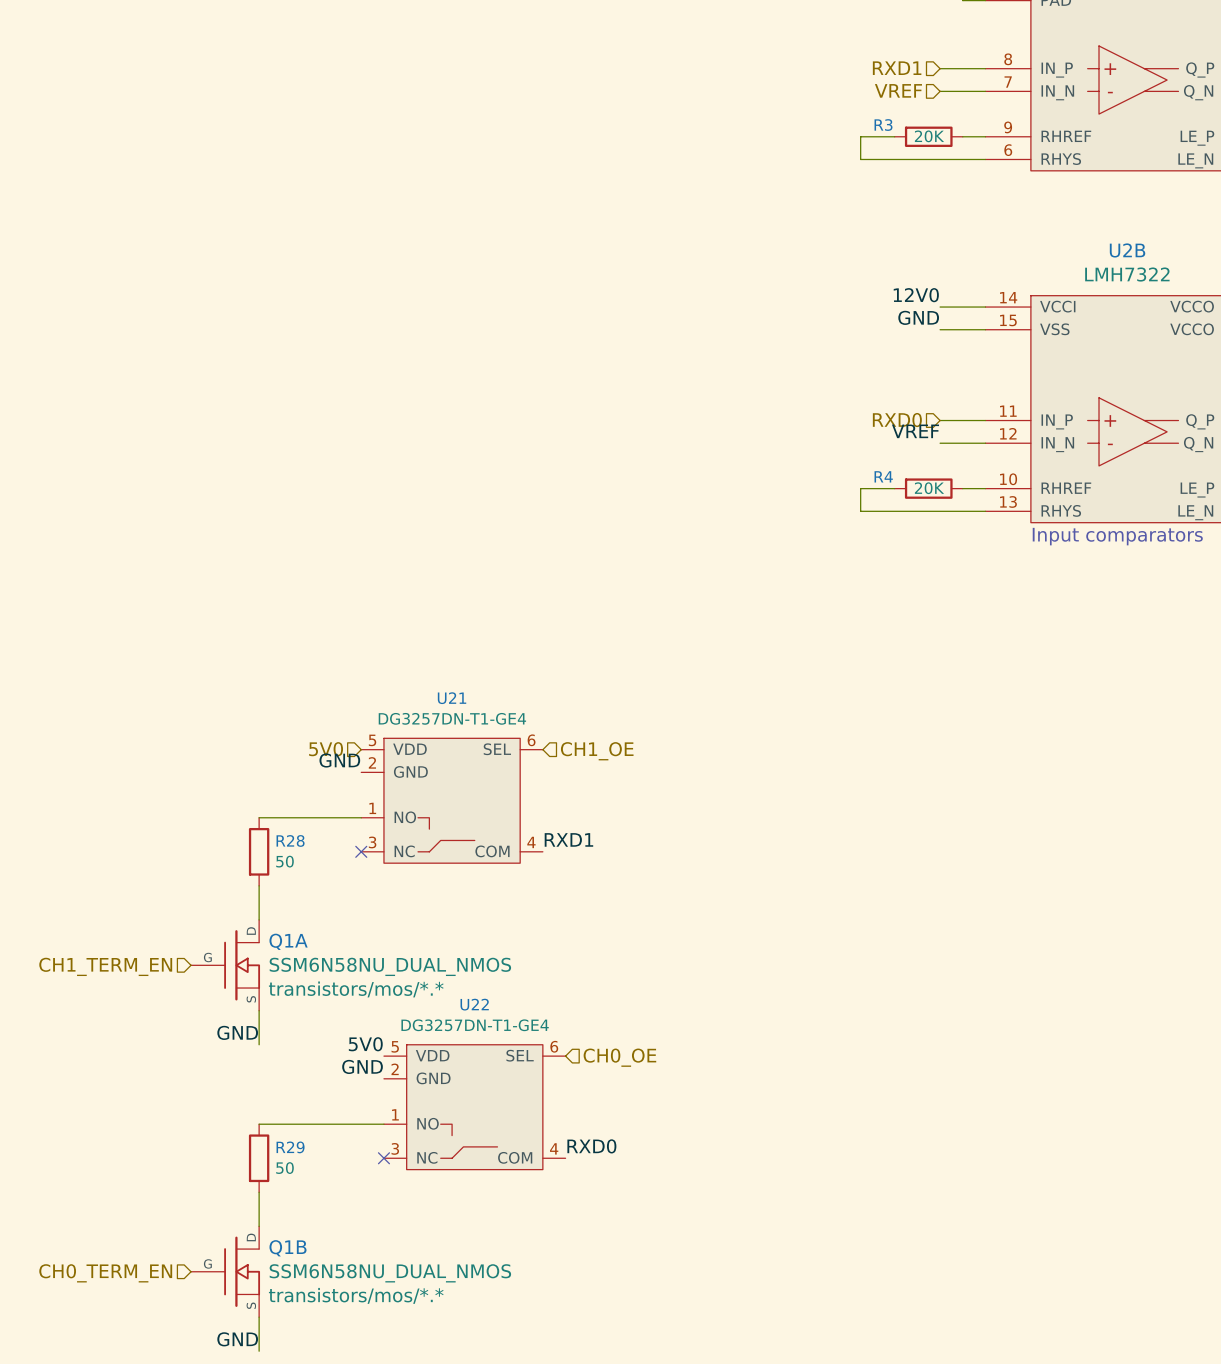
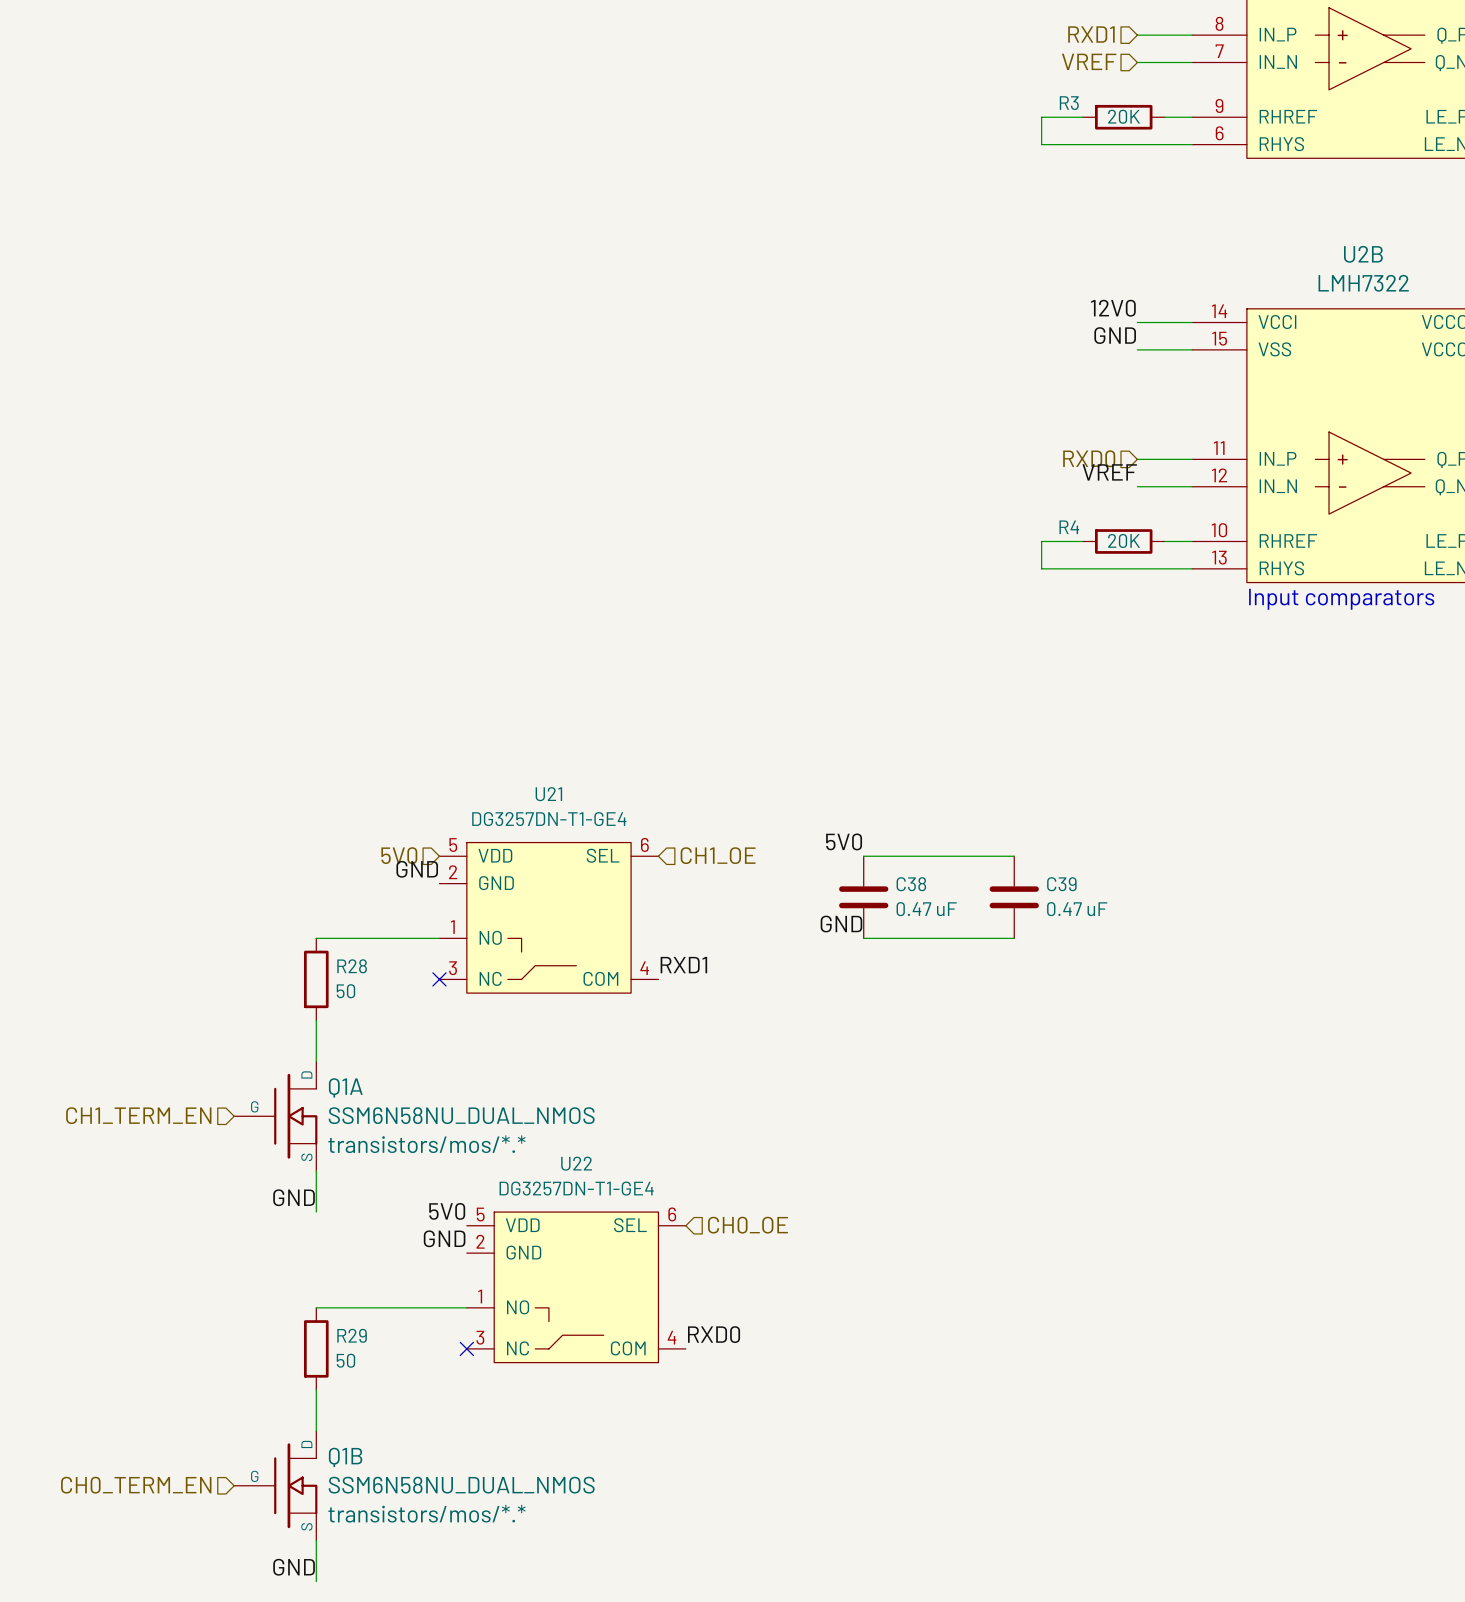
label: none -> 5V0 (844, 841)
wire: none -> (863, 856) (1014, 856)
C38: none -> 0.47 uF (863, 897)
C39: none -> 0.47 uF (1014, 897)
label: none -> GND (841, 924)
wire: none -> (863, 938) (1014, 938)

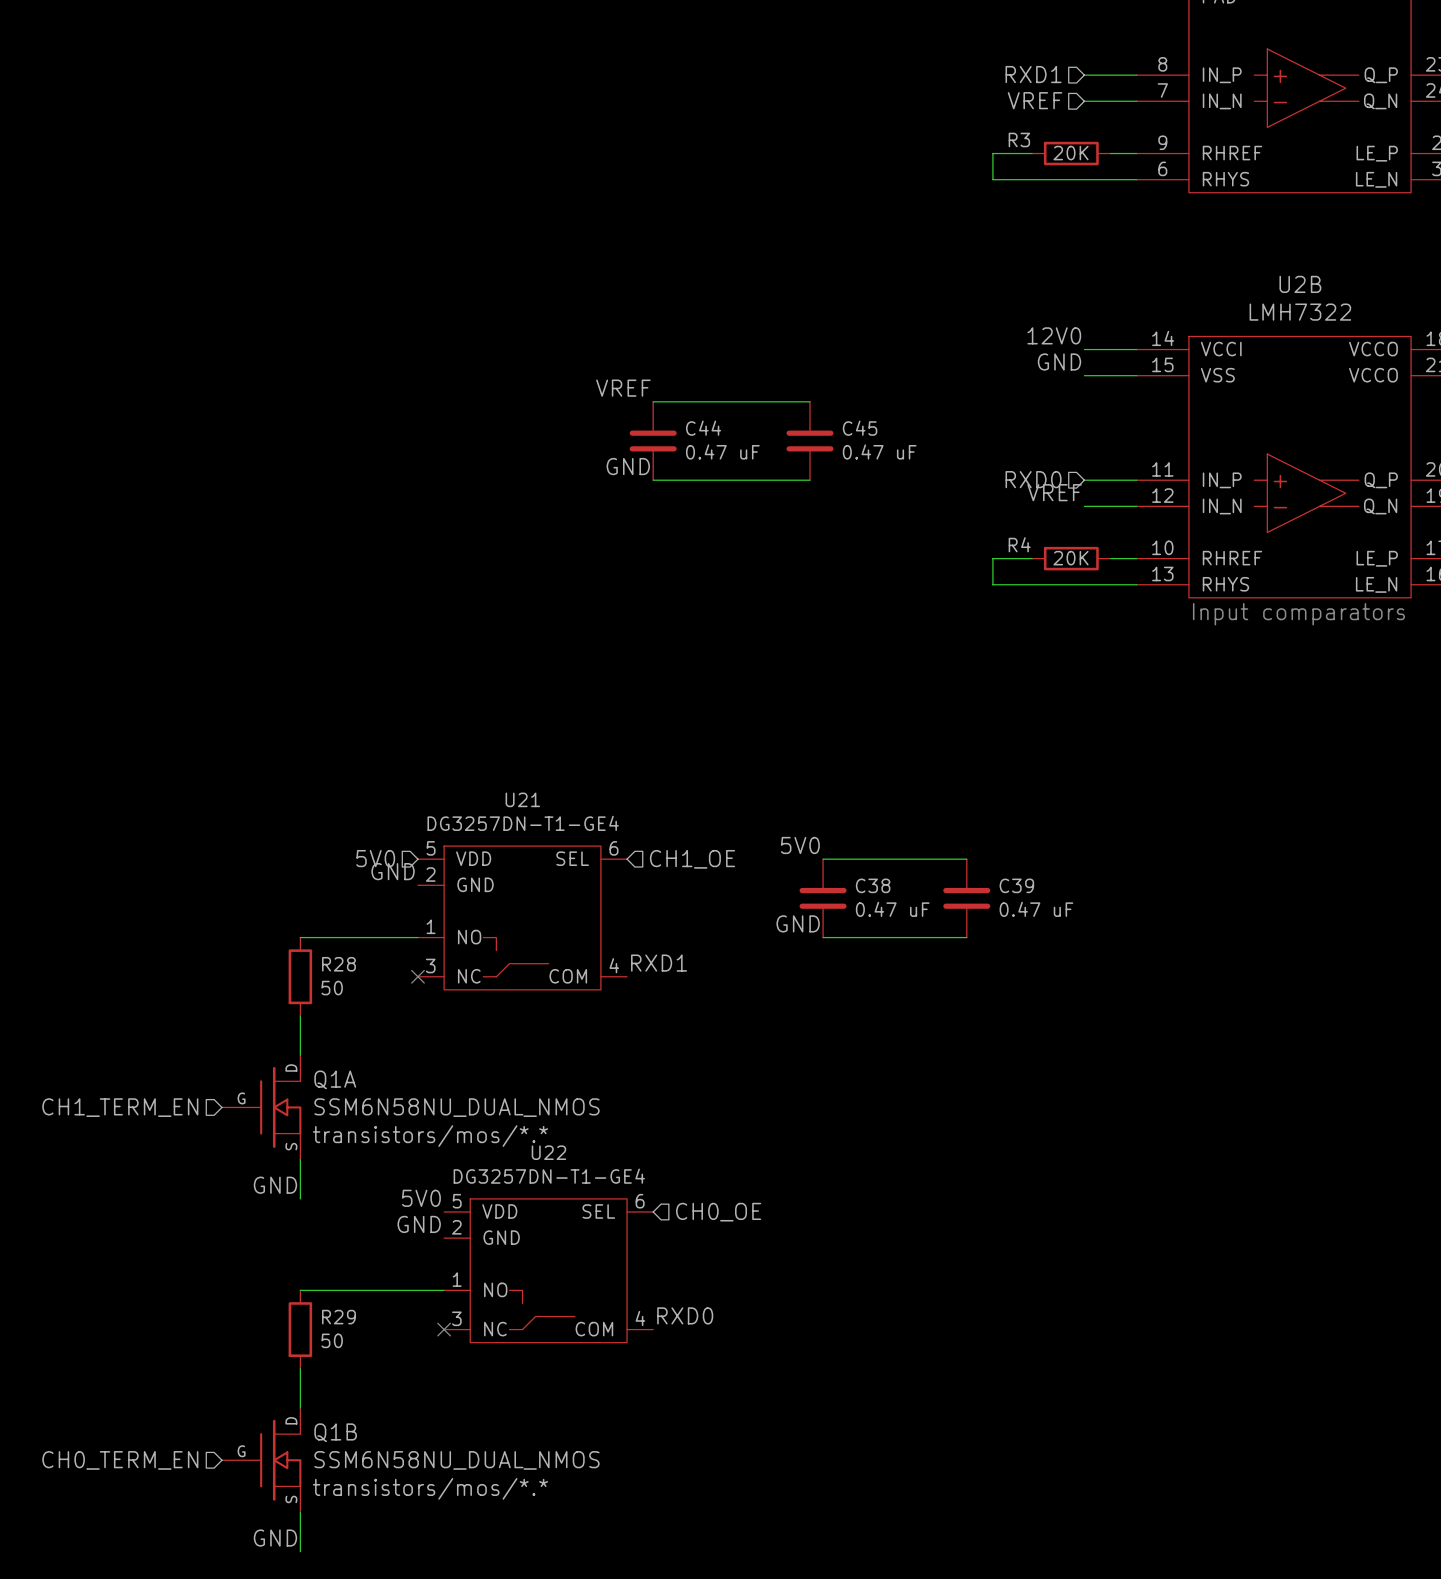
label: none -> VREF (623, 388)
wire: none -> (653, 401) (809, 401)
C44: none -> 0.47 uF (653, 441)
C45: none -> 0.47 uF (809, 441)
label: none -> GND (628, 466)
wire: none -> (653, 480) (809, 480)

